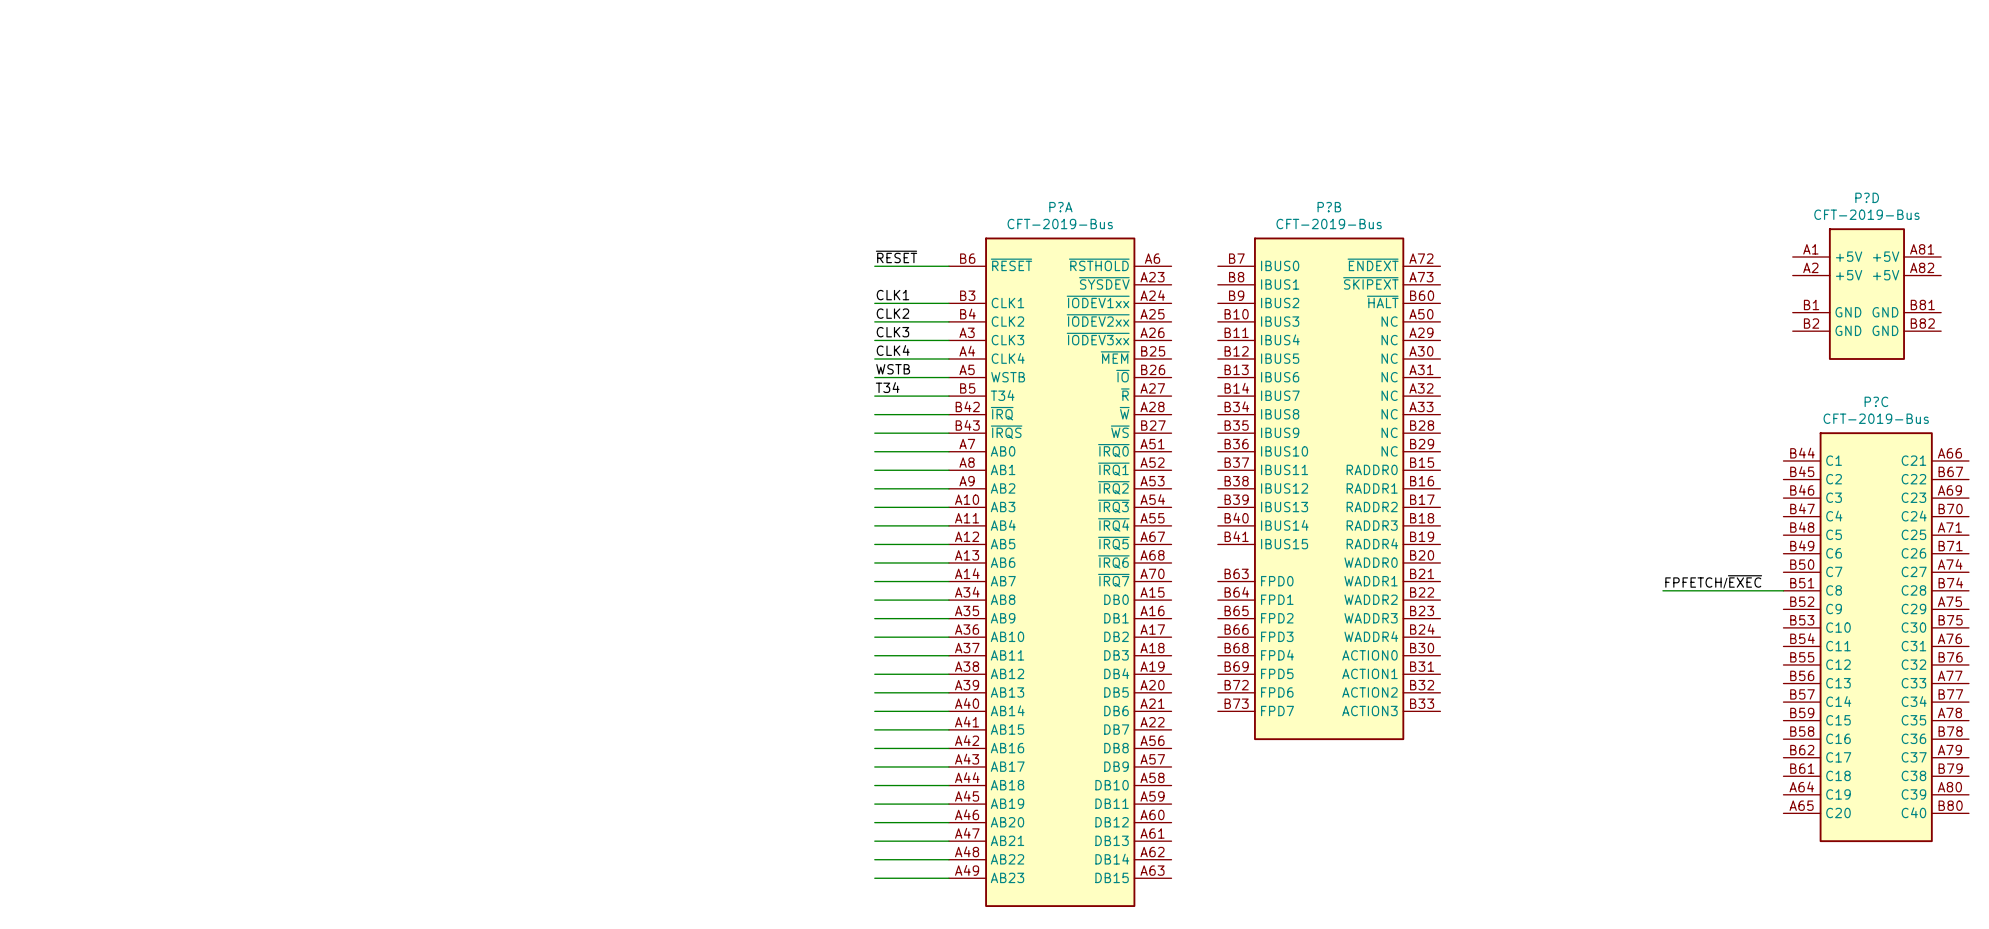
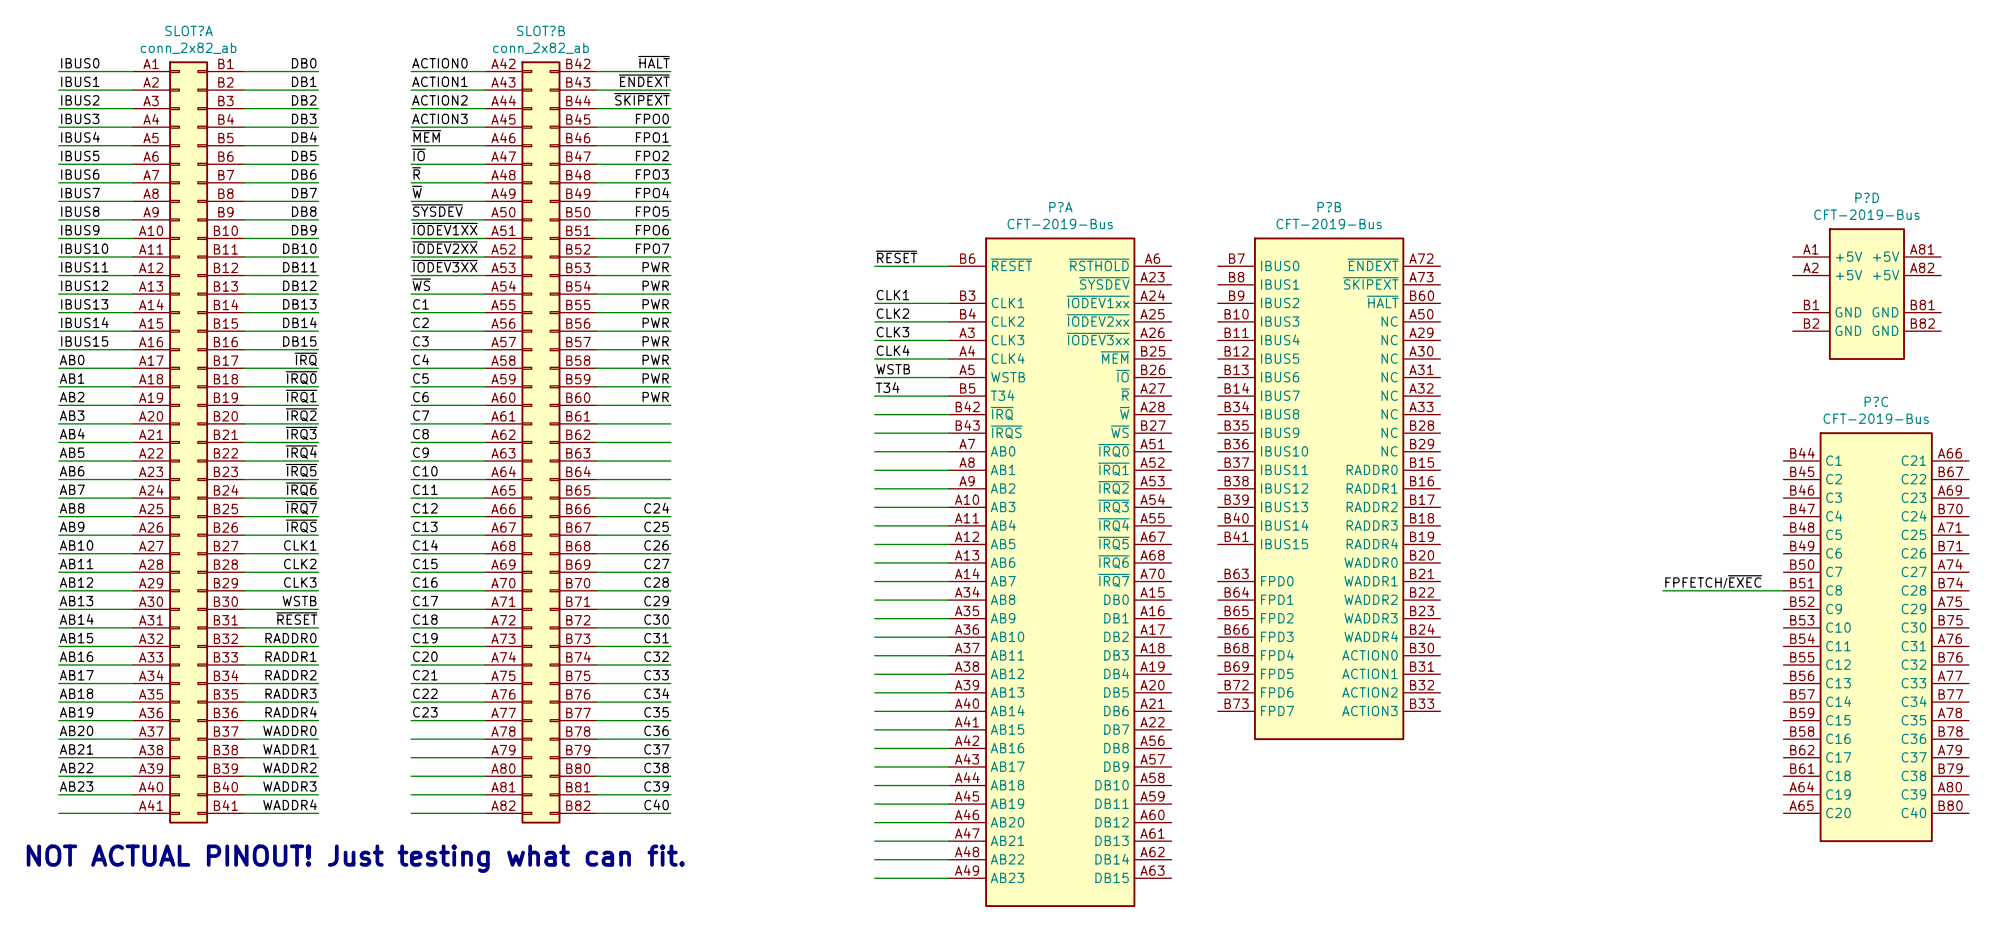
label: none -> ~{HALT} (653, 62)
label: none -> IBUS0 (80, 63)
label: none -> DB0 (304, 63)
label: none -> ACTION0 (439, 63)
wire: none -> (58, 71) (132, 71)
wire: none -> (244, 71) (318, 71)
wire: none -> (411, 71) (485, 71)
wire: none -> (596, 71) (670, 71)
label: none -> ~{ENDEXT} (644, 80)
label: none -> IBUS1 (80, 81)
label: none -> DB1 (304, 81)
label: none -> ACTION1 (439, 81)
wire: none -> (58, 90) (132, 90)
wire: none -> (244, 90) (318, 90)
wire: none -> (411, 90) (485, 90)
wire: none -> (596, 90) (670, 90)
label: none -> ~{SKIPEXT} (642, 99)
label: none -> IBUS2 (80, 100)
label: none -> DB2 (304, 100)
label: none -> ACTION2 (439, 100)
wire: none -> (58, 108) (132, 108)
wire: none -> (244, 108) (318, 108)
wire: none -> (411, 108) (485, 108)
wire: none -> (596, 108) (670, 108)
label: none -> IBUS3 (80, 118)
label: none -> DB3 (304, 118)
label: none -> ACTION3 (439, 118)
label: none -> FPO0 (652, 118)
wire: none -> (58, 127) (132, 127)
wire: none -> (244, 127) (318, 127)
wire: none -> (411, 127) (485, 127)
wire: none -> (596, 127) (670, 127)
label: none -> ~{MEM} (426, 136)
label: none -> IBUS4 (80, 137)
label: none -> DB4 (304, 137)
label: none -> FPO1 (652, 137)
wire: none -> (58, 145) (132, 145)
wire: none -> (244, 145) (318, 145)
wire: none -> (411, 145) (485, 145)
wire: none -> (596, 145) (670, 145)
label: none -> ~{IO} (418, 154)
label: none -> IBUS5 (80, 156)
label: none -> DB5 (304, 156)
label: none -> FPO2 (652, 156)
wire: none -> (58, 164) (132, 164)
wire: none -> (244, 164) (318, 164)
wire: none -> (411, 164) (485, 164)
wire: none -> (596, 164) (670, 164)
label: none -> ~{R} (416, 173)
label: none -> IBUS6 (80, 174)
label: none -> DB6 (304, 174)
label: none -> FPO3 (652, 174)
wire: none -> (58, 182) (132, 182)
wire: none -> (244, 182) (318, 182)
wire: none -> (411, 182) (485, 182)
wire: none -> (596, 182) (670, 182)
label: none -> ~{W} (417, 192)
label: none -> FPO4 (652, 192)
label: none -> IBUS7 (80, 193)
label: none -> DB7 (304, 193)
wire: none -> (58, 201) (132, 201)
wire: none -> (244, 201) (318, 201)
wire: none -> (411, 201) (485, 201)
wire: none -> (596, 201) (670, 201)
label: none -> ~{SYSDEV} (437, 210)
label: none -> IBUS8 (80, 211)
label: none -> DB8 (304, 211)
label: none -> FPO5 (652, 211)
wire: none -> (58, 219) (132, 219)
wire: none -> (244, 219) (318, 219)
wire: none -> (411, 219) (485, 219)
wire: none -> (596, 219) (670, 219)
label: none -> ~{IODEV1XX} (445, 229)
label: none -> IBUS9 (80, 230)
label: none -> DB9 (304, 230)
label: none -> FPO6 (652, 230)
wire: none -> (58, 238) (132, 238)
wire: none -> (244, 238) (318, 238)
wire: none -> (411, 238) (485, 238)
wire: none -> (596, 238) (670, 238)
label: none -> ~{IODEV2XX} (445, 247)
label: none -> IBUS10 (84, 248)
label: none -> DB10 (299, 248)
label: none -> FPO7 (652, 248)
wire: none -> (58, 257) (132, 257)
wire: none -> (244, 257) (318, 257)
wire: none -> (411, 257) (485, 257)
wire: none -> (596, 257) (670, 257)
label: none -> ~{IODEV3XX} (445, 266)
label: none -> IBUS11 (84, 267)
label: none -> DB11 (299, 267)
label: none -> PWR (655, 267)
wire: none -> (58, 275) (132, 275)
wire: none -> (244, 275) (318, 275)
wire: none -> (411, 275) (485, 275)
wire: none -> (596, 275) (670, 275)
label: none -> ~{WS} (421, 284)
label: none -> IBUS12 (84, 285)
label: none -> DB12 (299, 285)
label: none -> PWR (655, 285)
wire: none -> (58, 294) (132, 294)
wire: none -> (244, 294) (318, 294)
wire: none -> (411, 294) (485, 294)
wire: none -> (596, 294) (670, 294)
label: none -> IBUS13 (84, 304)
label: none -> DB13 (299, 304)
label: none -> C1 (420, 304)
label: none -> PWR (655, 304)
wire: none -> (58, 312) (132, 312)
wire: none -> (244, 312) (318, 312)
wire: none -> (411, 312) (485, 312)
wire: none -> (596, 312) (670, 312)
label: none -> IBUS14 (84, 322)
label: none -> DB14 (300, 322)
label: none -> C2 (420, 322)
label: none -> PWR (655, 322)
wire: none -> (58, 331) (132, 331)
wire: none -> (244, 331) (318, 331)
wire: none -> (411, 331) (485, 331)
wire: none -> (596, 331) (670, 331)
label: none -> IBUS15 (84, 341)
label: none -> DB15 (299, 341)
label: none -> C3 (420, 341)
label: none -> PWR (655, 341)
wire: none -> (58, 349) (132, 349)
wire: none -> (244, 349) (318, 349)
wire: none -> (411, 349) (485, 349)
wire: none -> (596, 349) (670, 349)
label: none -> AB0 (72, 359)
label: none -> ~{IRQ} (305, 359)
label: none -> C4 (421, 359)
label: none -> PWR (655, 359)
wire: none -> (58, 368) (132, 368)
wire: none -> (244, 368) (318, 368)
wire: none -> (411, 368) (485, 368)
wire: none -> (596, 368) (670, 368)
label: none -> ~{IRQ0} (301, 377)
label: none -> AB1 (72, 378)
label: none -> C5 (420, 378)
label: none -> PWR (655, 378)
wire: none -> (58, 386) (132, 386)
wire: none -> (244, 386) (318, 386)
wire: none -> (411, 386) (485, 386)
wire: none -> (596, 386) (670, 386)
label: none -> ~{IRQ1} (301, 396)
label: none -> AB2 (72, 397)
label: none -> C6 (420, 397)
label: none -> PWR (655, 397)
wire: none -> (58, 405) (132, 405)
wire: none -> (244, 405) (318, 405)
wire: none -> (411, 405) (485, 405)
wire: none -> (596, 405) (670, 405)
label: none -> AB3 (72, 415)
label: none -> ~{IRQ2} (301, 415)
label: none -> C7 (421, 415)
wire: none -> (58, 423) (132, 423)
wire: none -> (244, 423) (318, 423)
wire: none -> (411, 423) (485, 423)
wire: none -> (596, 423) (670, 423)
label: none -> AB4 (72, 433)
label: none -> ~{IRQ3} (301, 433)
label: none -> C8 (420, 434)
wire: none -> (58, 442) (132, 442)
SLOT?A: none -> conn_2x82_ab (188, 442)
wire: none -> (244, 442) (318, 442)
wire: none -> (411, 442) (485, 442)
SLOT?B: none -> conn_2x82_ab (540, 442)
wire: none -> (596, 442) (670, 442)
label: none -> AB5 (72, 452)
label: none -> ~{IRQ4} (301, 452)
label: none -> C9 (420, 452)
wire: none -> (58, 460) (132, 460)
wire: none -> (244, 460) (318, 460)
wire: none -> (411, 460) (485, 460)
wire: none -> (596, 460) (670, 460)
label: none -> ~{IRQ5} (301, 470)
label: none -> AB6 (72, 471)
label: none -> C10 (425, 471)
wire: none -> (58, 479) (132, 479)
wire: none -> (244, 479) (318, 479)
wire: none -> (411, 479) (485, 479)
wire: none -> (596, 479) (670, 479)
label: none -> AB7 (72, 489)
label: none -> ~{IRQ6} (301, 489)
label: none -> C11 (425, 489)
wire: none -> (58, 498) (132, 498)
wire: none -> (244, 498) (318, 498)
wire: none -> (411, 498) (485, 498)
wire: none -> (596, 498) (670, 498)
label: none -> ~{IRQ7} (301, 507)
label: none -> AB8 (72, 508)
label: none -> C12 (425, 508)
label: none -> C24 (656, 508)
wire: none -> (58, 516) (132, 516)
wire: none -> (244, 516) (318, 516)
wire: none -> (411, 516) (485, 516)
wire: none -> (596, 516) (670, 516)
label: none -> AB9 (72, 526)
label: none -> ~{IRQS} (301, 526)
label: none -> C13 (425, 526)
label: none -> C25 (656, 526)
wire: none -> (58, 535) (132, 535)
wire: none -> (244, 535) (318, 535)
wire: none -> (411, 535) (485, 535)
wire: none -> (596, 535) (670, 535)
label: none -> AB10 (76, 545)
label: none -> CLK1 (300, 545)
label: none -> C14 (425, 545)
label: none -> C26 (656, 545)
wire: none -> (58, 553) (132, 553)
wire: none -> (244, 553) (318, 553)
wire: none -> (411, 553) (485, 553)
wire: none -> (596, 553) (670, 553)
label: none -> AB11 (76, 563)
label: none -> CLK2 (300, 563)
label: none -> C15 (425, 563)
label: none -> C27 (656, 563)
wire: none -> (58, 572) (132, 572)
wire: none -> (244, 572) (318, 572)
wire: none -> (411, 572) (485, 572)
wire: none -> (596, 572) (670, 572)
label: none -> AB12 (76, 582)
label: none -> CLK3 (300, 582)
label: none -> C16 (425, 582)
label: none -> C28 (656, 582)
wire: none -> (58, 590) (132, 590)
wire: none -> (244, 590) (318, 590)
wire: none -> (411, 590) (485, 590)
wire: none -> (596, 590) (670, 590)
label: none -> AB13 (76, 601)
label: none -> WSTB (299, 601)
label: none -> C17 (425, 601)
label: none -> C29 (656, 601)
wire: none -> (58, 609) (132, 609)
wire: none -> (244, 609) (318, 609)
wire: none -> (411, 609) (485, 609)
wire: none -> (596, 609) (670, 609)
label: none -> ~{RESET} (296, 618)
label: none -> AB14 (76, 619)
label: none -> C18 (425, 619)
label: none -> C30 (656, 619)
wire: none -> (58, 627) (132, 627)
wire: none -> (244, 627) (318, 627)
wire: none -> (411, 627) (485, 627)
wire: none -> (596, 627) (670, 627)
label: none -> AB15 (76, 638)
label: none -> RADDR0 (290, 638)
label: none -> C19 (425, 638)
label: none -> C31 (656, 638)
wire: none -> (58, 646) (132, 646)
wire: none -> (244, 646) (318, 646)
wire: none -> (411, 646) (485, 646)
wire: none -> (596, 646) (670, 646)
label: none -> AB16 (76, 656)
label: none -> RADDR1 (290, 656)
label: none -> C20 (425, 656)
label: none -> C32 (656, 656)
wire: none -> (58, 664) (132, 664)
wire: none -> (244, 664) (318, 664)
wire: none -> (411, 664) (485, 664)
wire: none -> (596, 664) (670, 664)
label: none -> AB17 (76, 675)
label: none -> RADDR2 (290, 675)
label: none -> C21 (425, 675)
label: none -> C33 (656, 675)
wire: none -> (58, 683) (132, 683)
wire: none -> (244, 683) (318, 683)
wire: none -> (411, 683) (485, 683)
wire: none -> (596, 683) (670, 683)
label: none -> AB18 (76, 693)
label: none -> RADDR3 (290, 693)
label: none -> C22 (425, 693)
label: none -> C34 (656, 693)
wire: none -> (58, 702) (132, 702)
wire: none -> (244, 702) (318, 702)
wire: none -> (411, 702) (485, 702)
wire: none -> (596, 702) (670, 702)
label: none -> AB19 (76, 712)
label: none -> RADDR4 (291, 712)
label: none -> C23 (425, 712)
label: none -> C35 (656, 712)
wire: none -> (58, 720) (132, 720)
wire: none -> (244, 720) (318, 720)
wire: none -> (411, 720) (485, 720)
wire: none -> (596, 720) (670, 720)
label: none -> AB20 (76, 730)
label: none -> WADDR0 (289, 730)
label: none -> C36 (656, 730)
wire: none -> (58, 739) (132, 739)
wire: none -> (244, 739) (318, 739)
wire: none -> (411, 739) (485, 739)
wire: none -> (596, 739) (670, 739)
label: none -> AB21 (76, 749)
label: none -> WADDR1 (289, 749)
label: none -> C37 (656, 749)
wire: none -> (58, 757) (132, 757)
wire: none -> (244, 757) (318, 757)
wire: none -> (411, 757) (485, 757)
wire: none -> (596, 757) (670, 757)
label: none -> AB22 (76, 767)
label: none -> WADDR2 (289, 767)
label: none -> C38 (656, 767)
wire: none -> (58, 776) (132, 776)
wire: none -> (244, 776) (318, 776)
wire: none -> (411, 776) (485, 776)
wire: none -> (596, 776) (670, 776)
label: none -> AB23 (76, 786)
label: none -> WADDR3 (289, 786)
label: none -> C39 (656, 786)
wire: none -> (58, 794) (132, 794)
wire: none -> (244, 794) (318, 794)
wire: none -> (411, 794) (485, 794)
wire: none -> (596, 794) (670, 794)
label: none -> WADDR4 (290, 804)
label: none -> C40 (656, 804)
wire: none -> (58, 813) (132, 813)
wire: none -> (244, 813) (318, 813)
wire: none -> (411, 813) (485, 813)
wire: none -> (596, 813) (670, 813)
text: none -> NOT ACTUAL PINOUT! Just testing what can fit. (355, 858)

